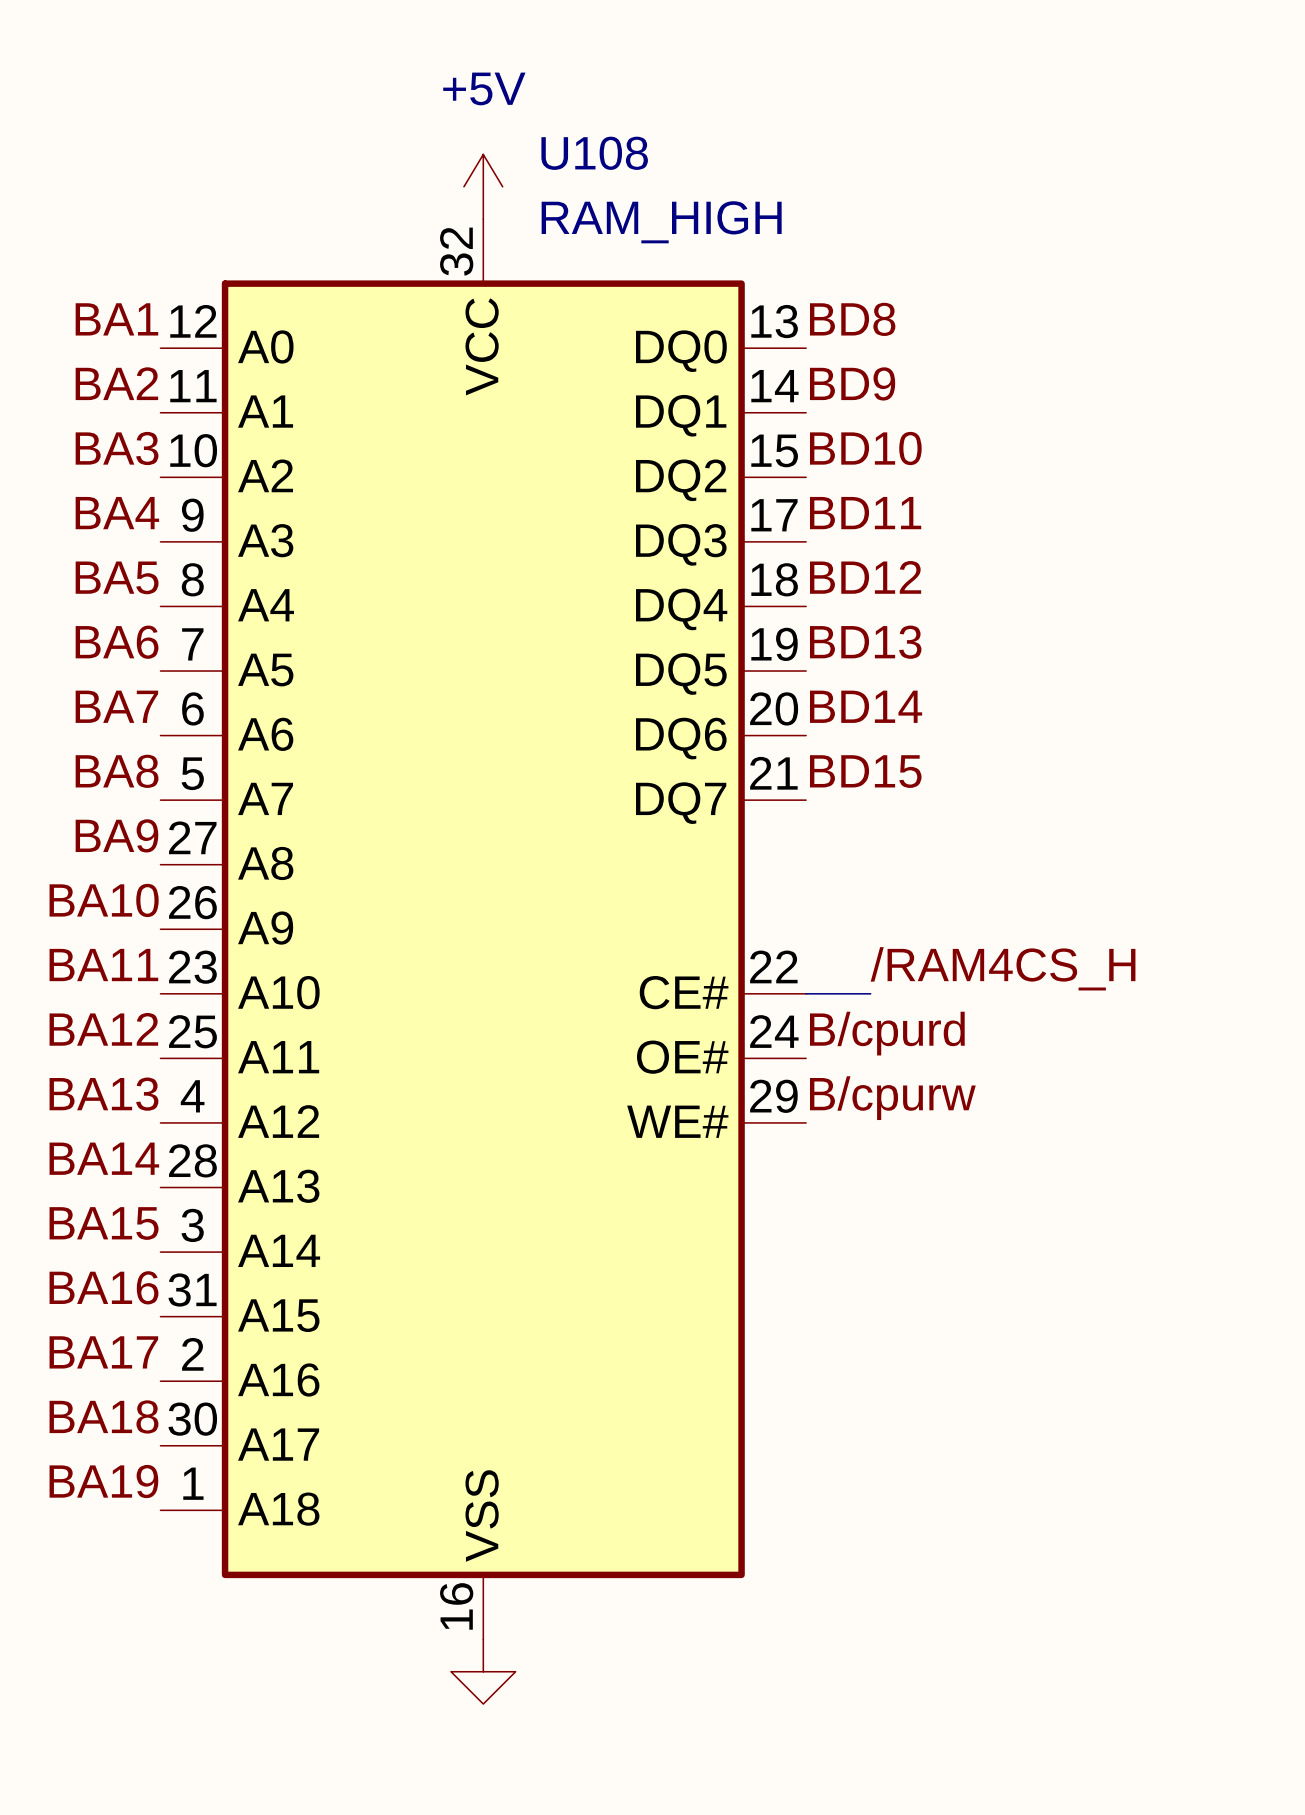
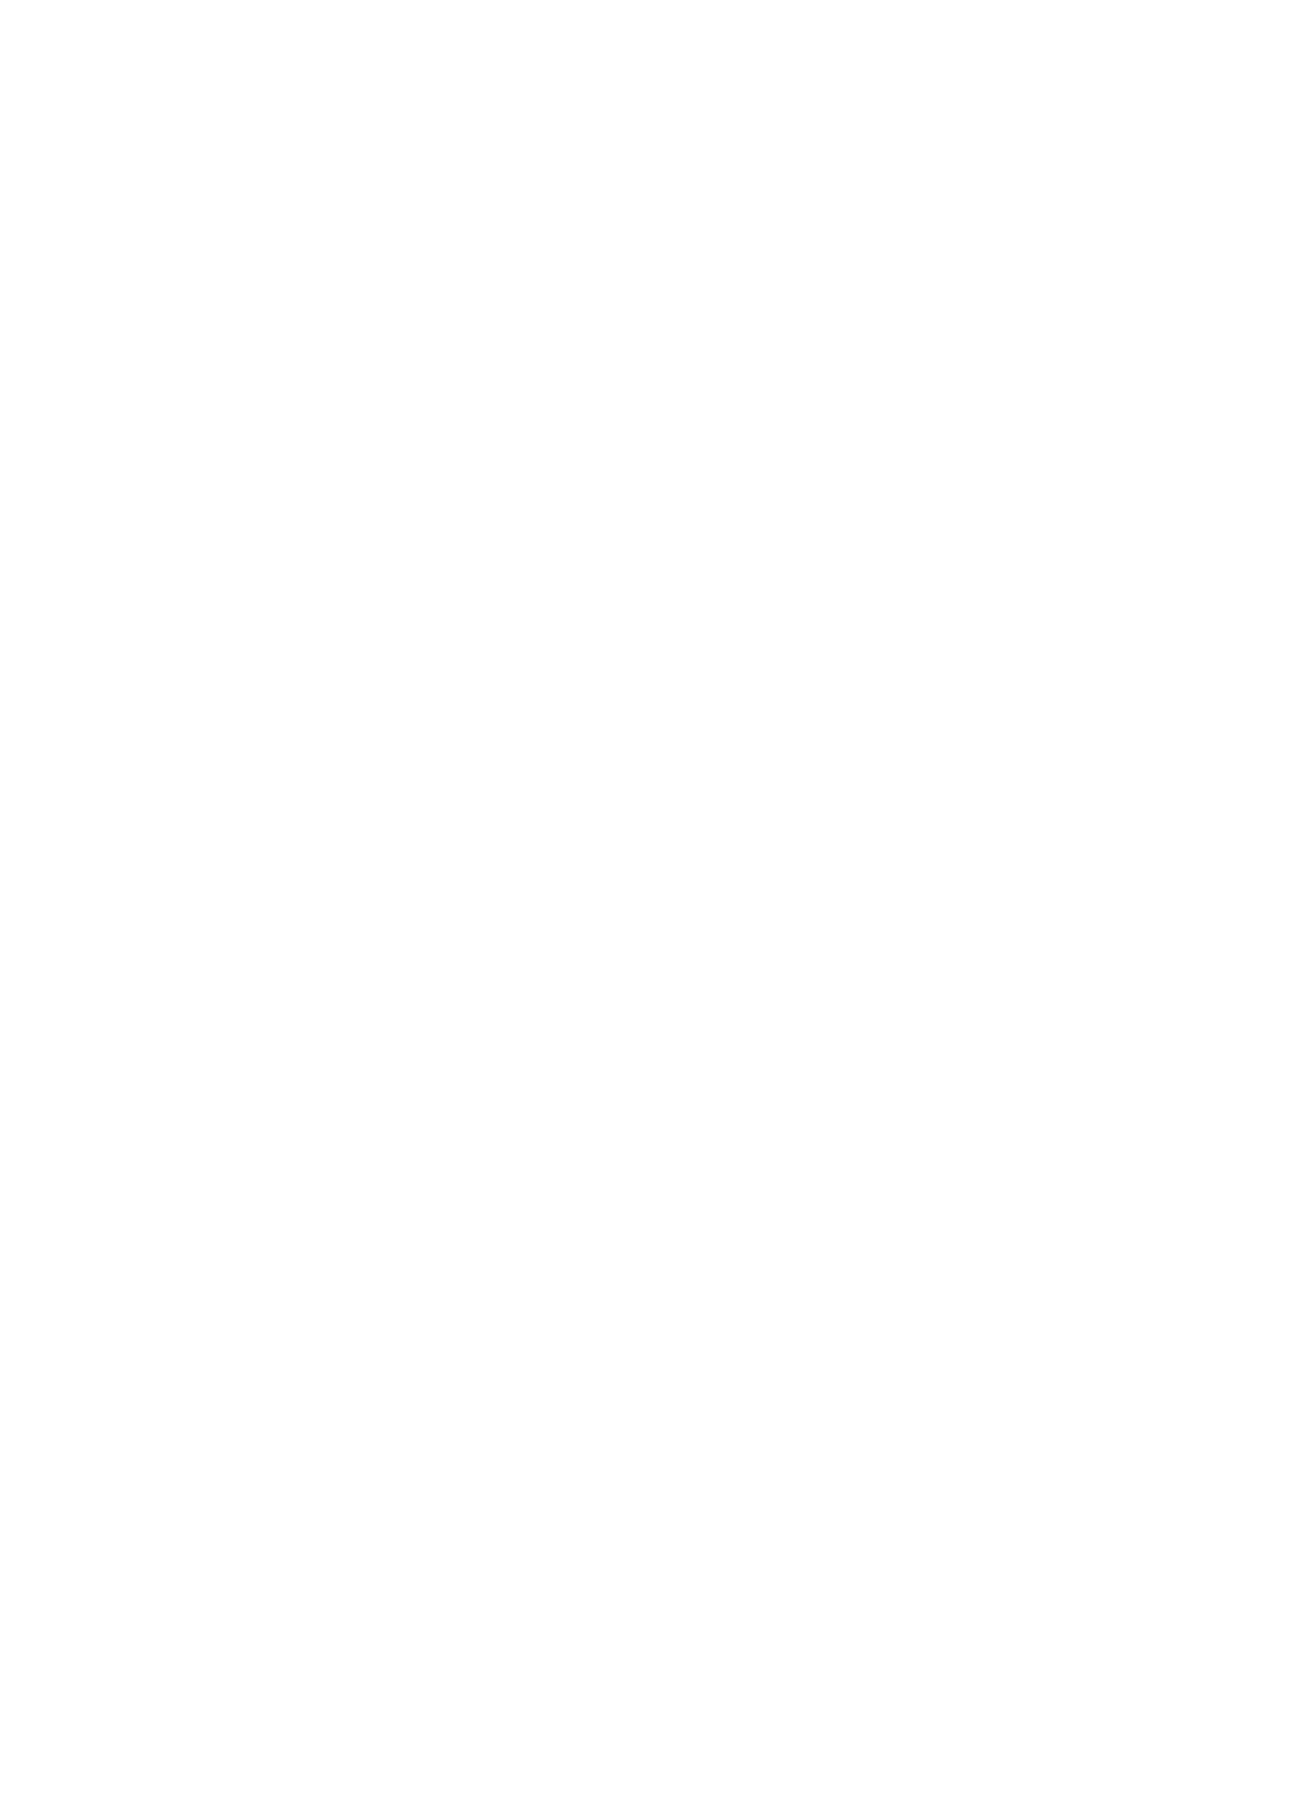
power symbol: +5V (483, 186) -> none
label: BA1 (116, 319) -> none
label: BD8 (852, 319) -> none
label: BA2 (116, 383) -> none
label: BD9 (852, 383) -> none
label: BA3 (117, 448) -> none
label: BD10 (865, 448) -> none
label: BA4 (117, 513) -> none
label: BD11 (865, 513) -> none
label: BA5 (117, 577) -> none
label: BD12 (865, 577) -> none
label: BA6 (117, 642) -> none
label: BD13 (865, 642) -> none
label: BA7 (116, 706) -> none
label: BD14 (866, 706) -> none
label: BA8 (117, 771) -> none
label: BD15 (865, 771) -> none
label: BA9 (116, 835) -> none
label: BA10 (104, 900) -> none
U108: RAM_HIGH (483, 929) -> none
label: BA11 (103, 965) -> none
label: /RAM4CS_H (1003, 968) -> none
wire: (806, 993) (870, 993) -> none
label: BA12 (103, 1029) -> none
label: B/cpurd (887, 1033) -> none
label: BA13 (103, 1094) -> none
label: B/cpurw (892, 1098) -> none
label: BA14 (104, 1158) -> none
label: BA15 (104, 1223) -> none
label: BA16 (103, 1287) -> none
label: BA17 (103, 1352) -> none
label: BA18 (104, 1416) -> none
label: BA19 (103, 1481) -> none
power symbol: (483, 1671) -> none

